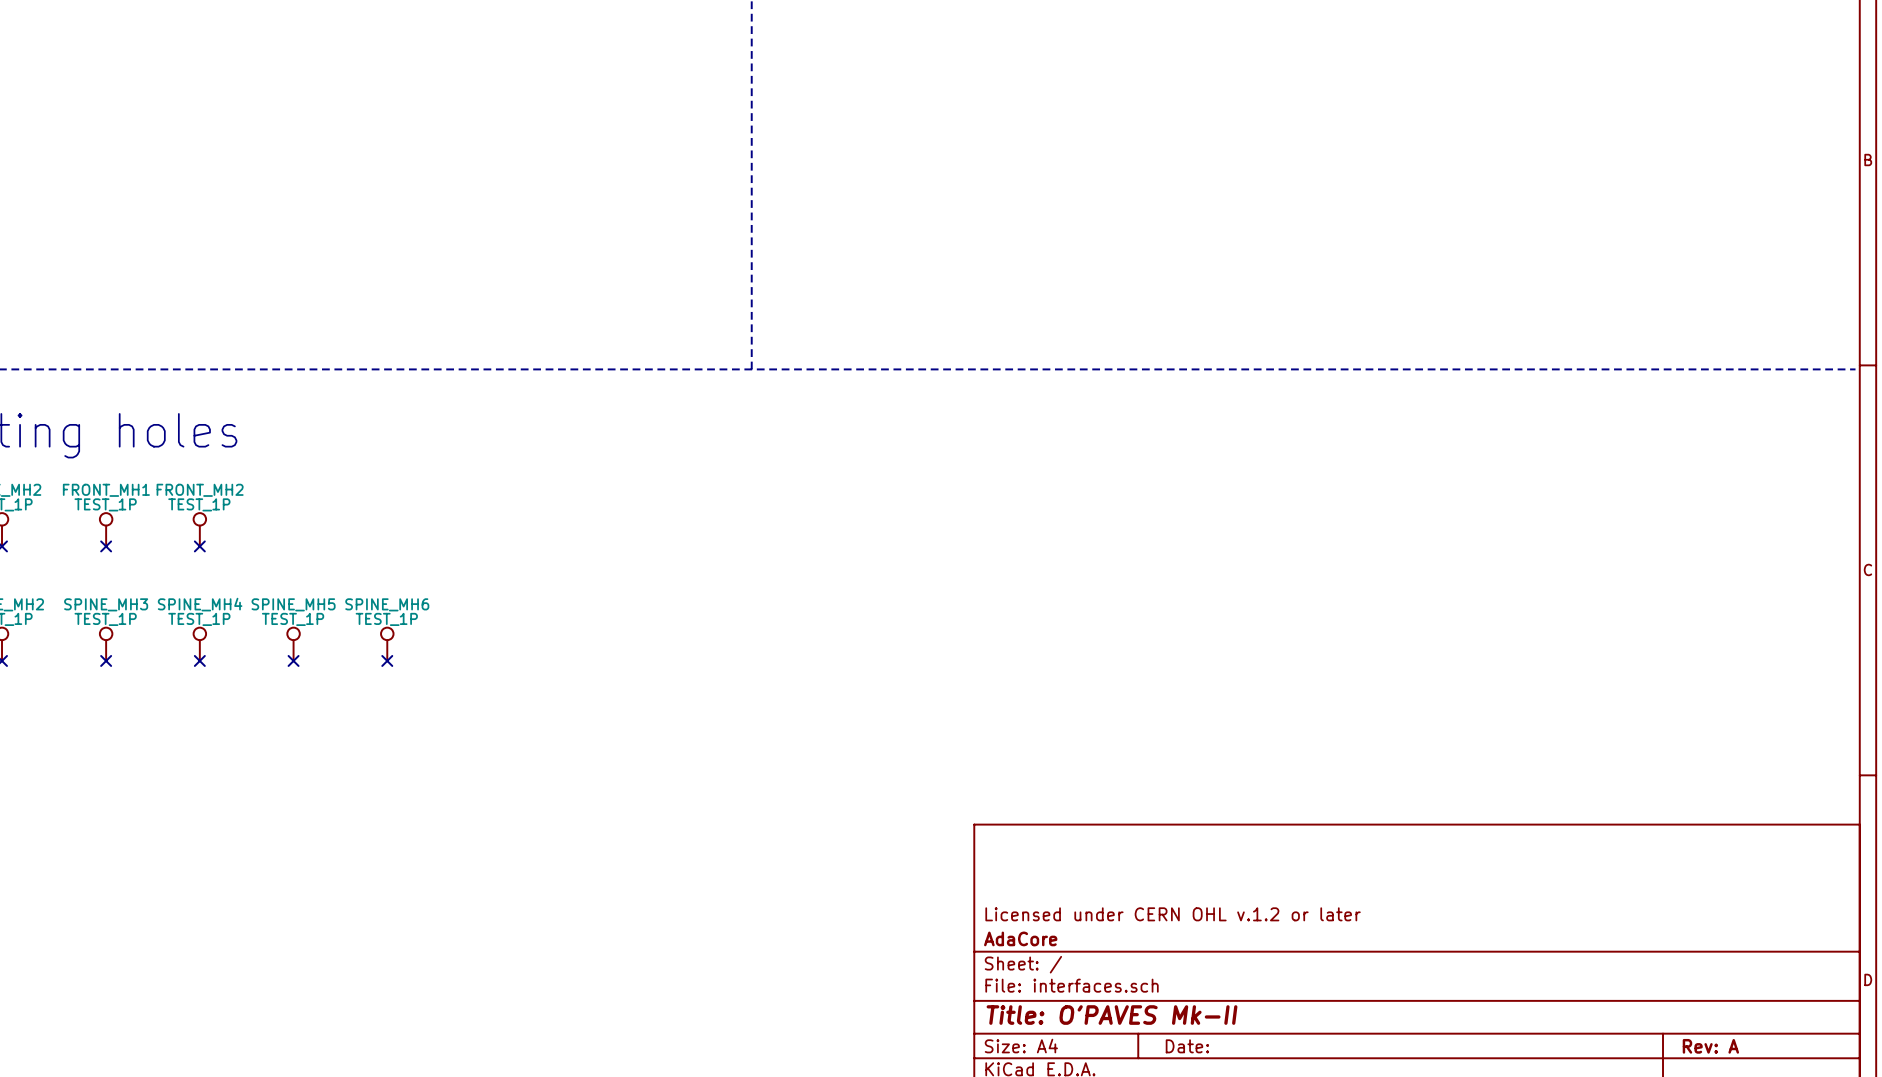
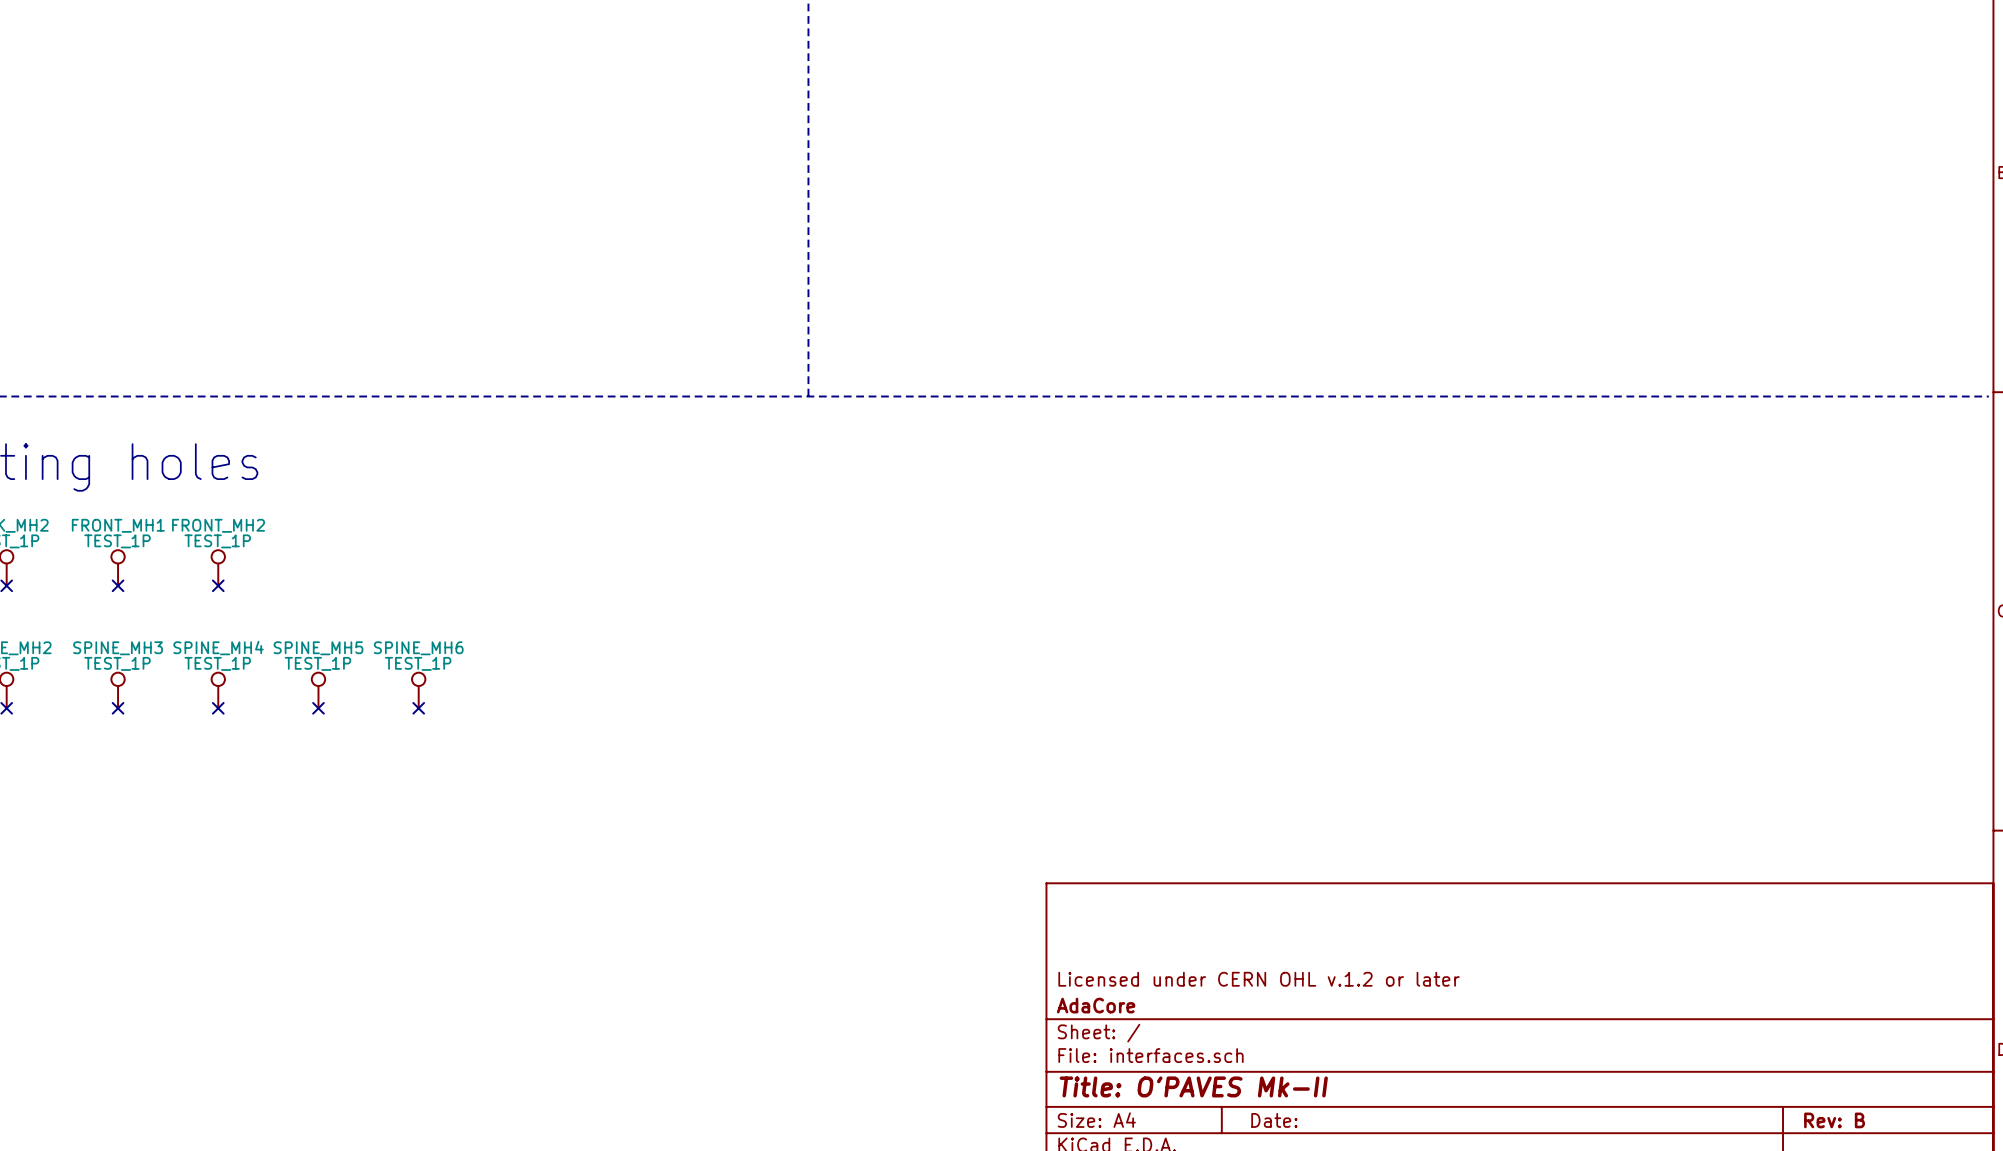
title block: Rev: A (1710, 1046) -> Rev: B (1834, 1120)

